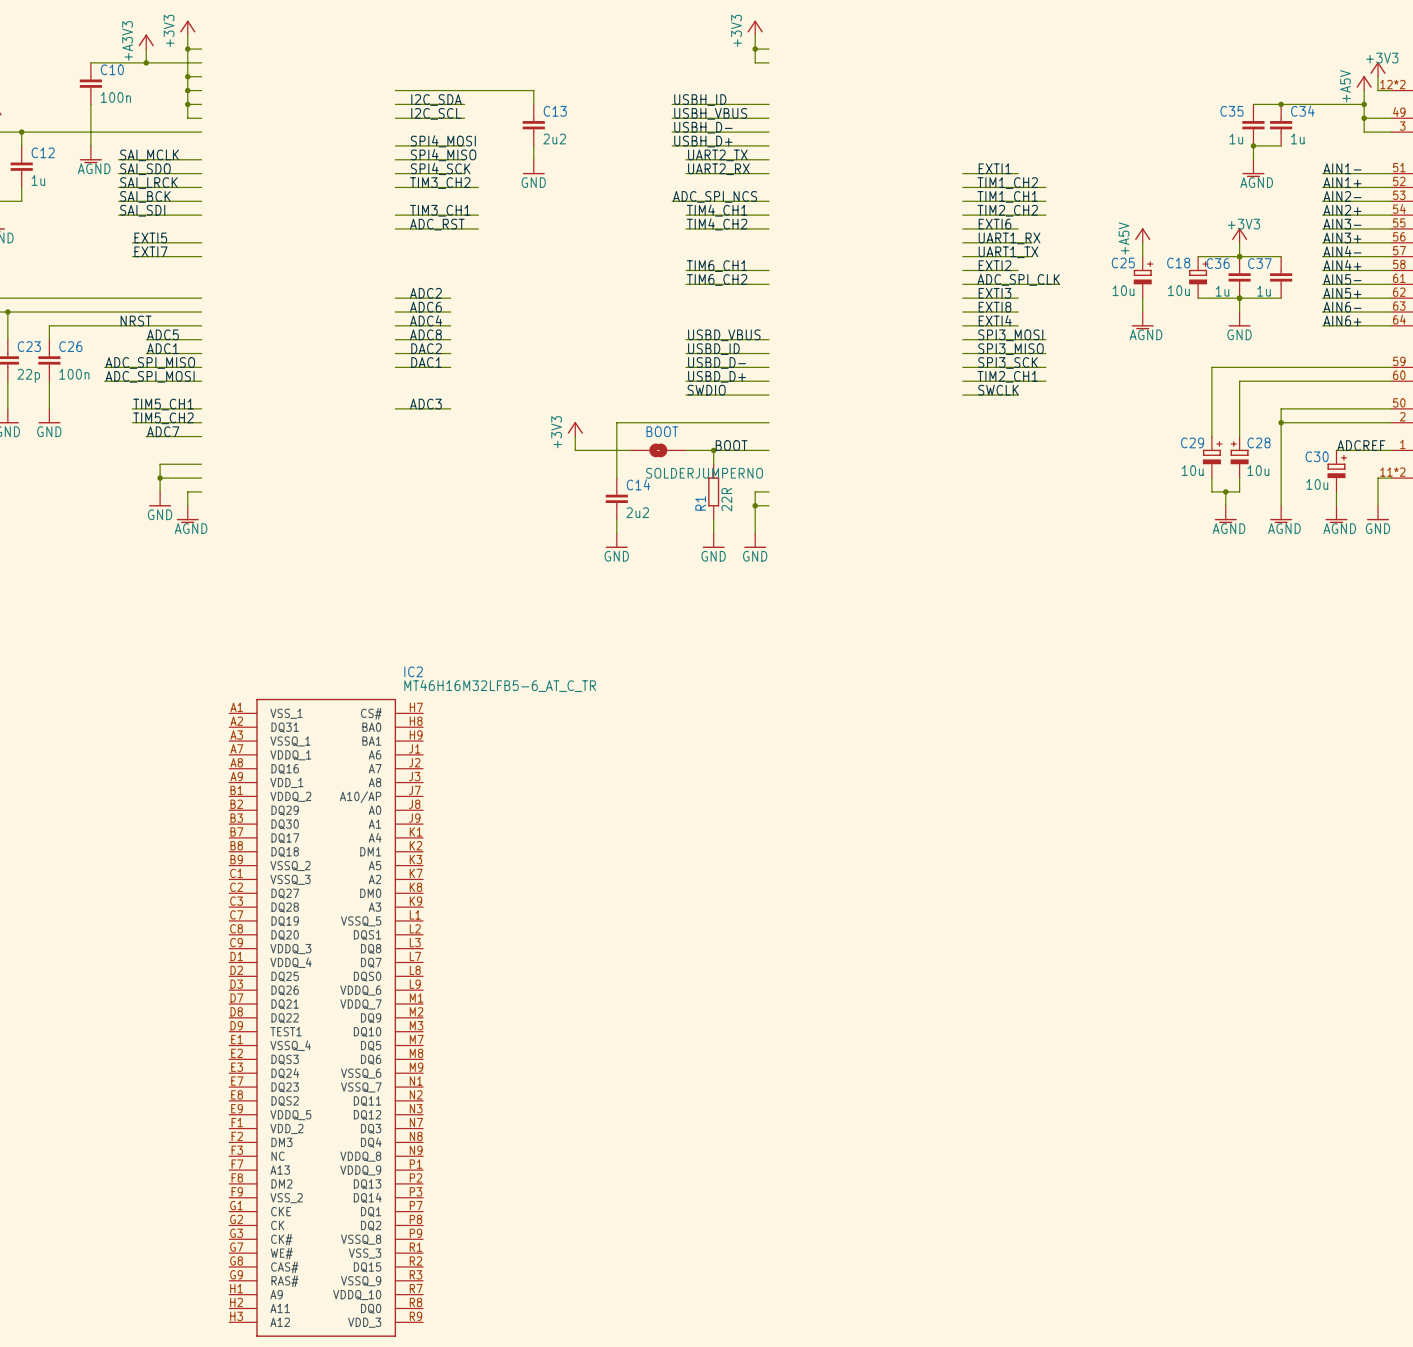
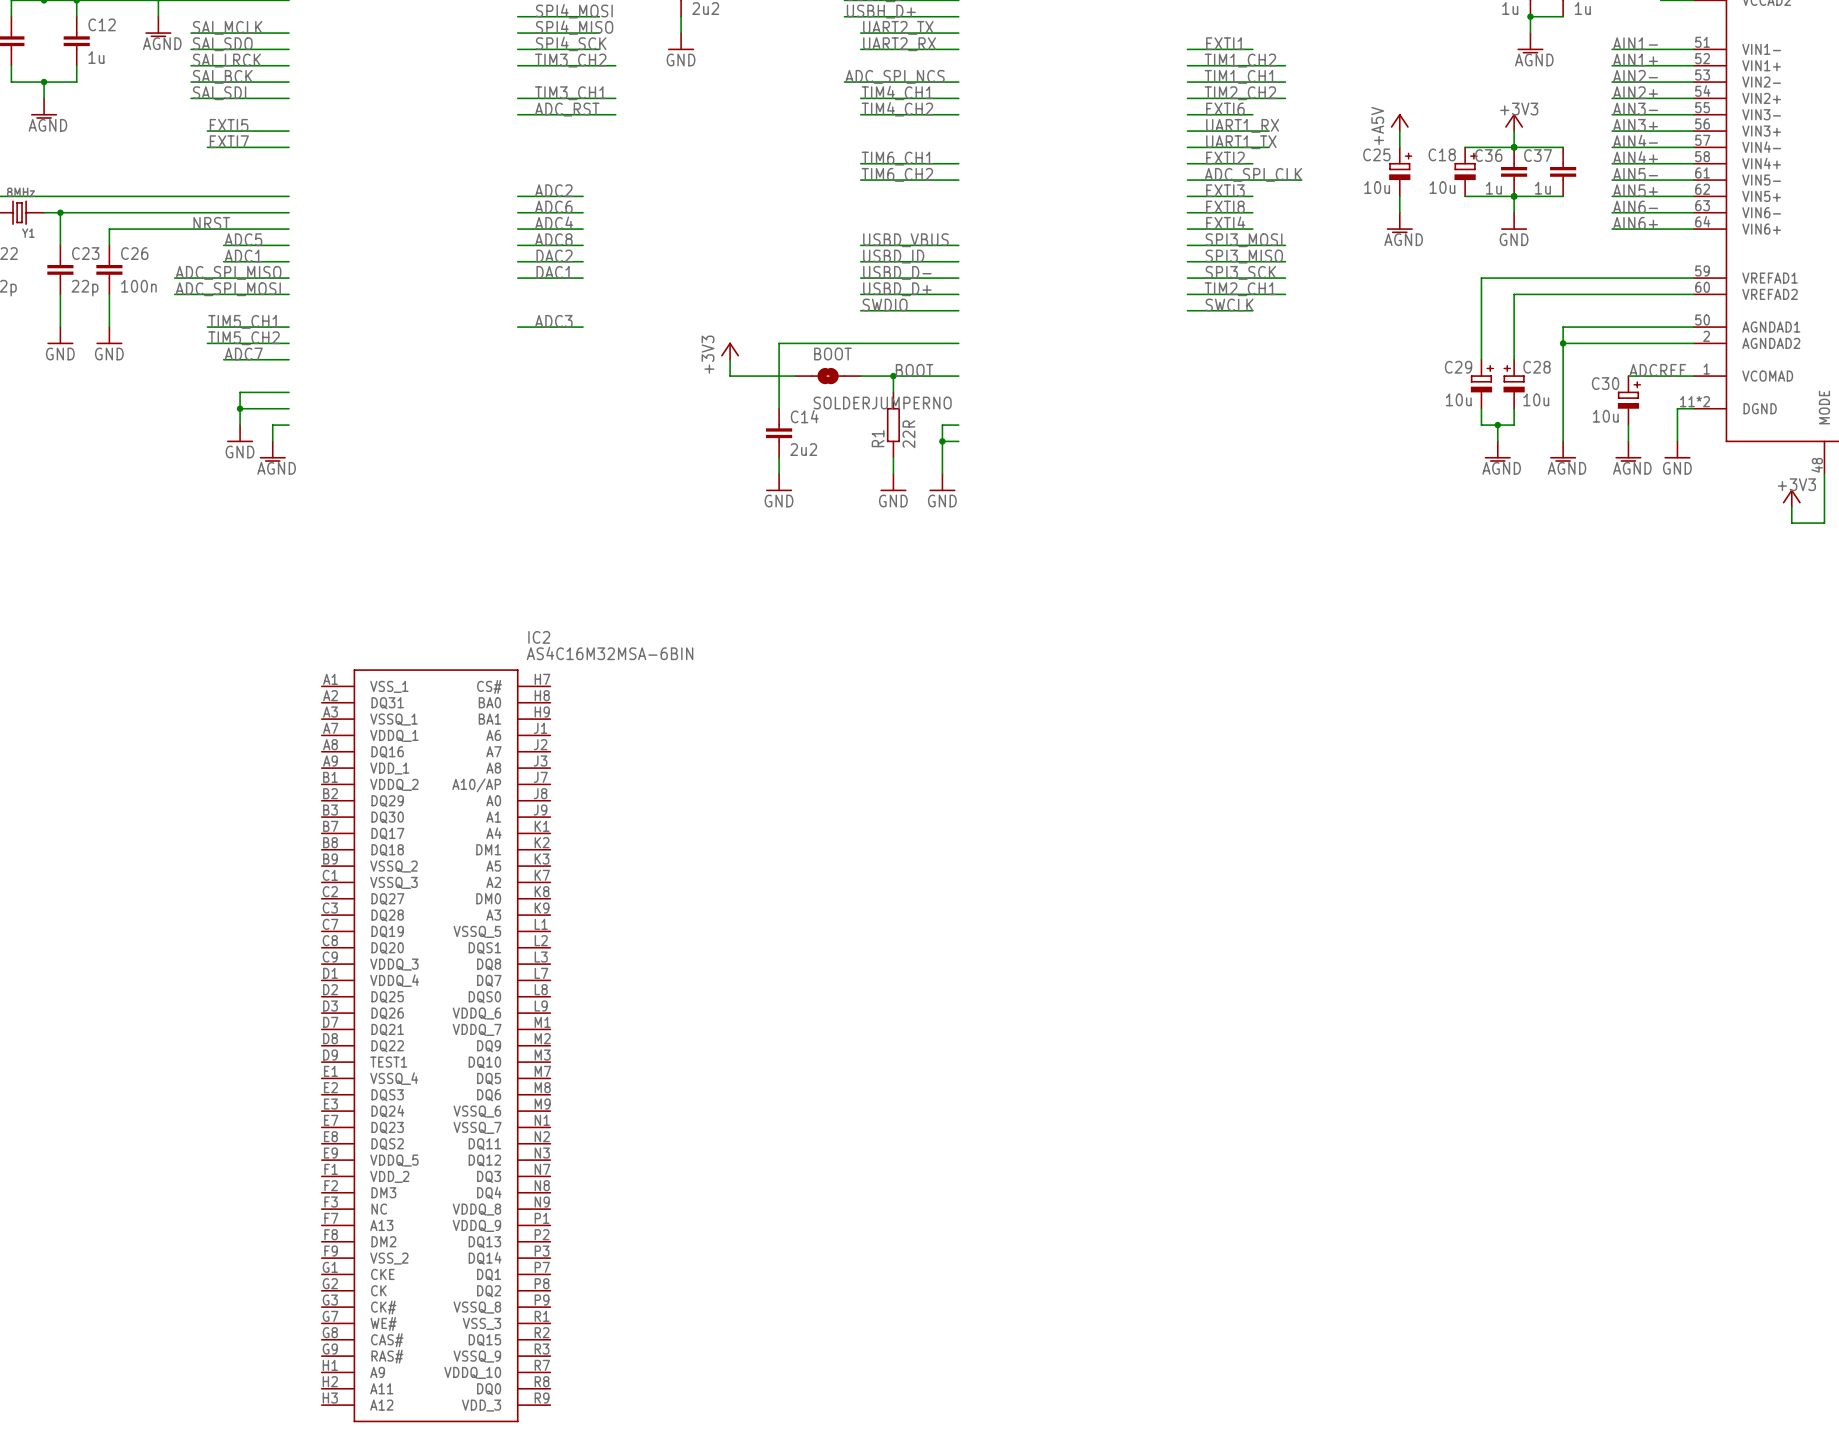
IC2 value: MT46H16M32LFB5-6_AT_C_TR (500, 685) -> AS4C16M32MSA-6BIN (610, 653)

